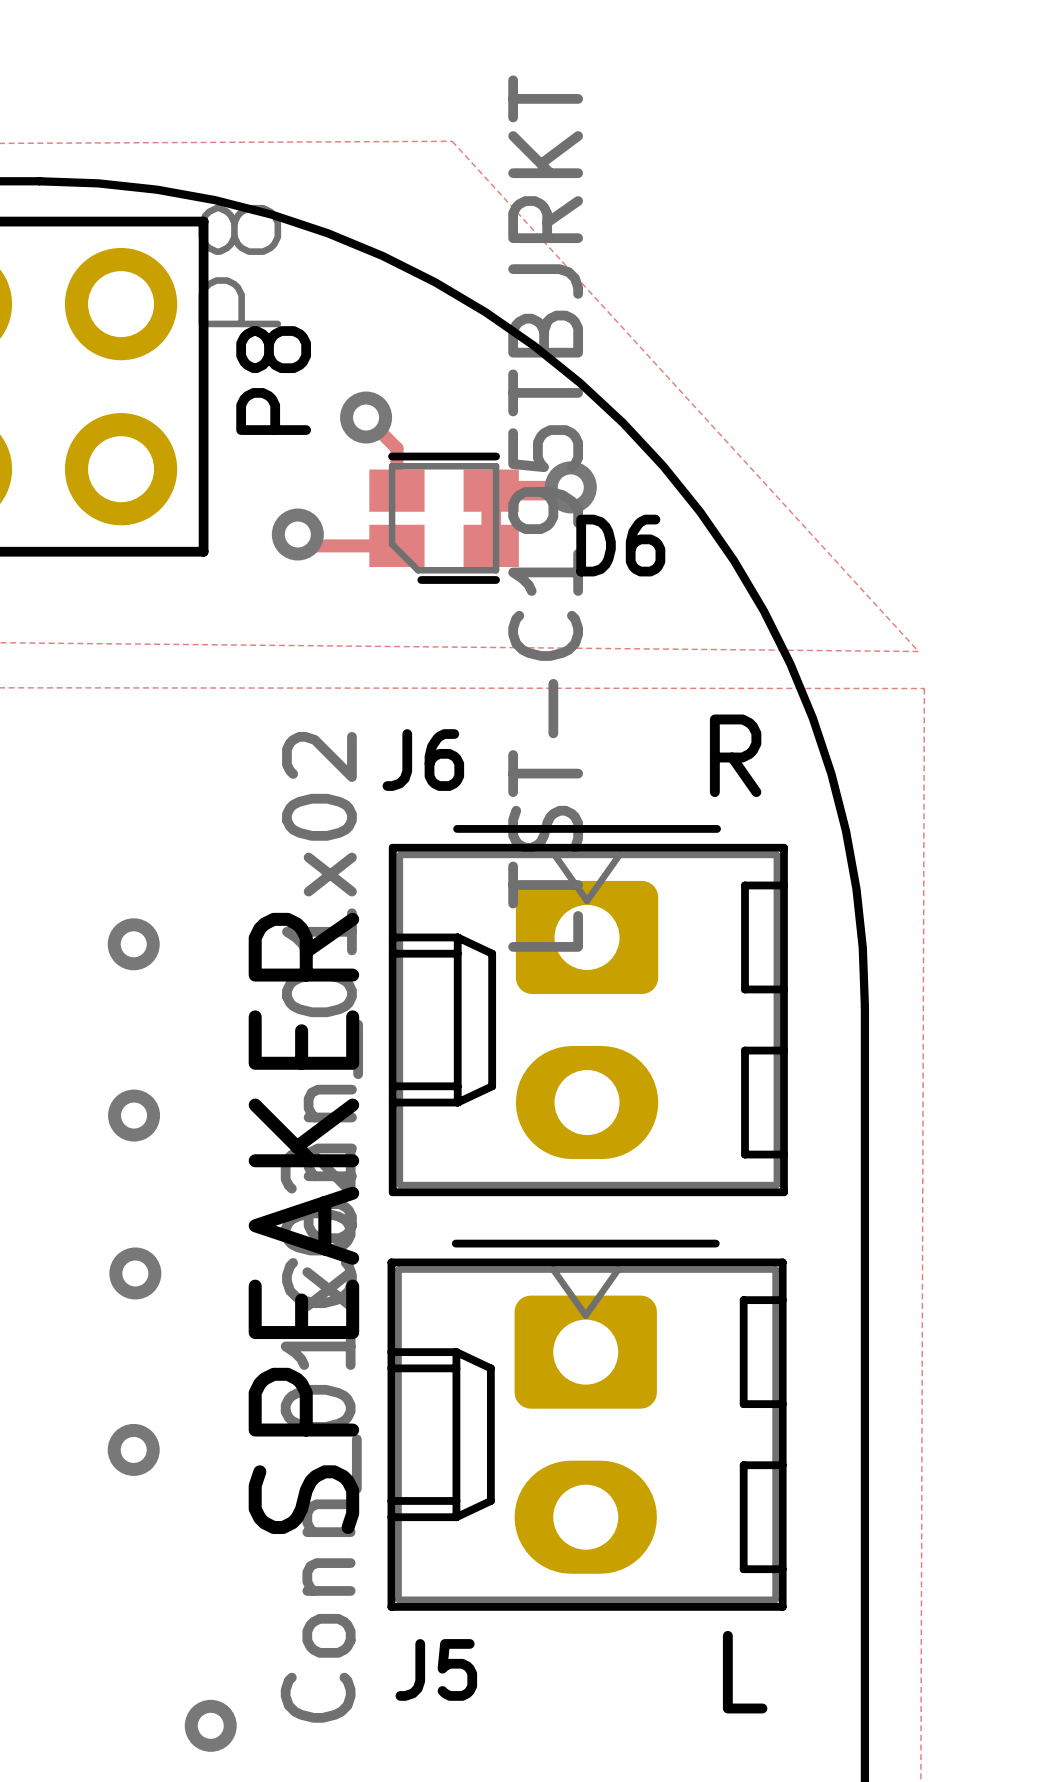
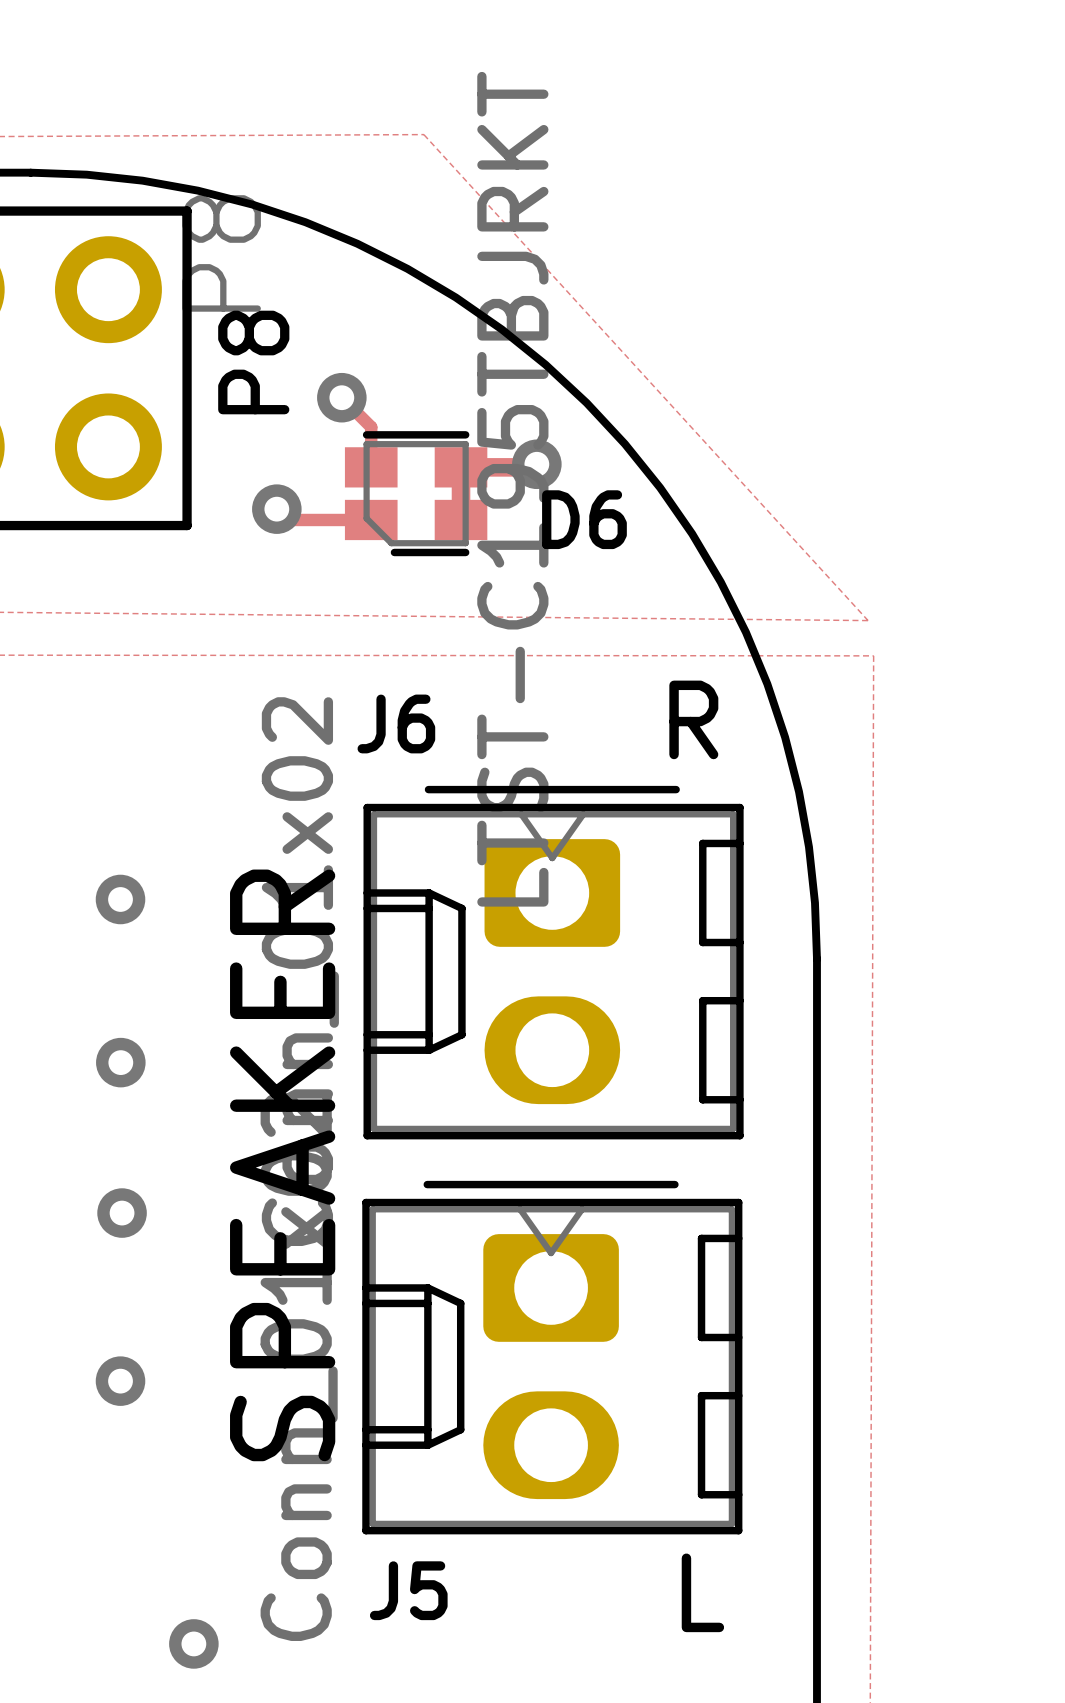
J6 footprint: [388, 825, 788, 1197] -> [363, 785, 744, 1140]
J5 footprint: [387, 1239, 787, 1611] -> [362, 1180, 743, 1535]

